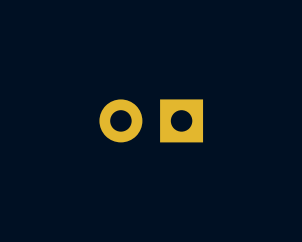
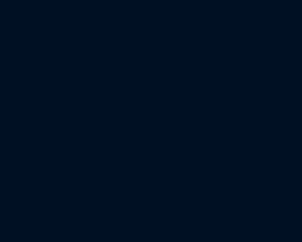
part: (151, 120) -> none

